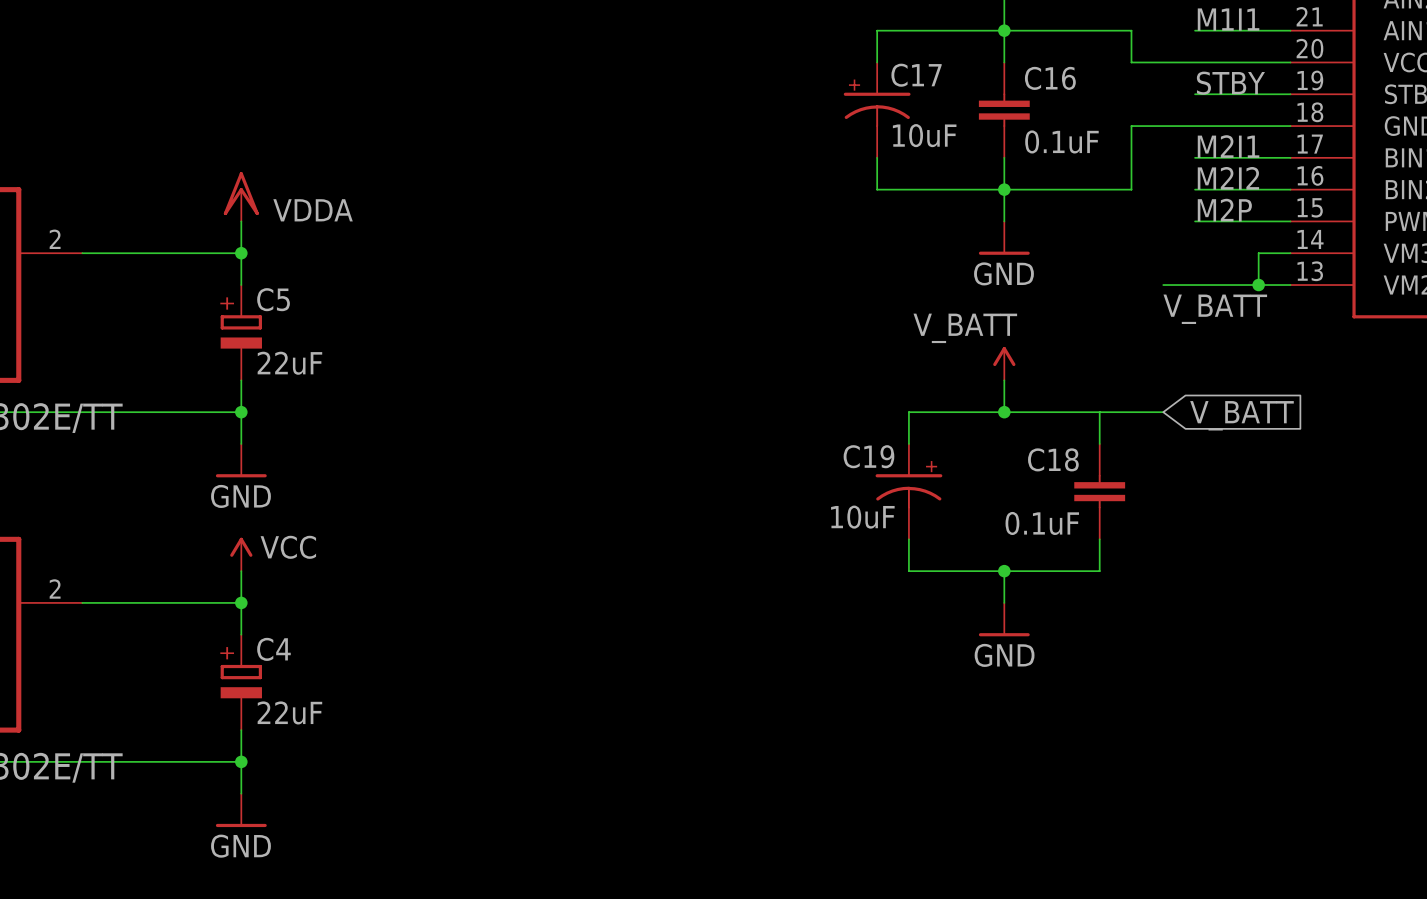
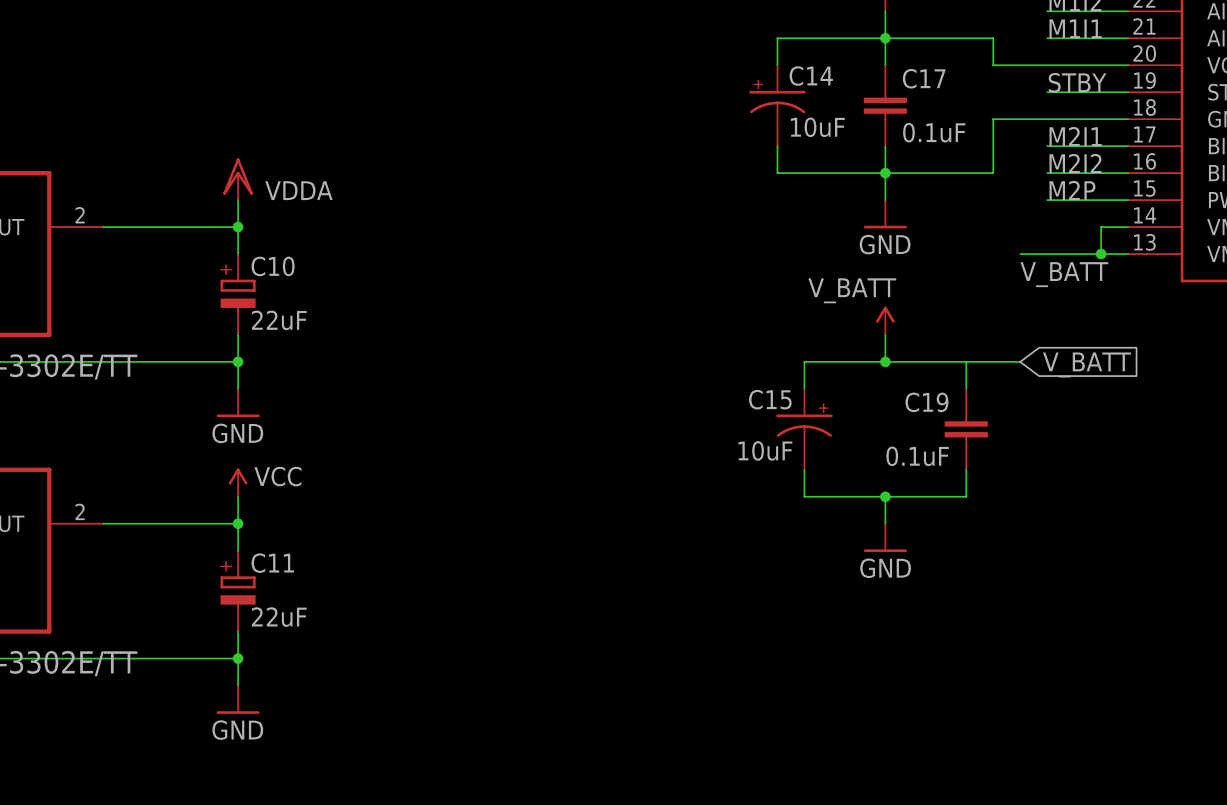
C17 name: C17 (916, 75) -> C14 (811, 76)
C16 name: C16 (1050, 78) -> C17 (924, 78)
C5 name: C5 (273, 299) -> C10 (273, 266)
C19 name: C19 (868, 456) -> C15 (770, 399)
C18 name: C18 (1053, 459) -> C19 (926, 402)
C4 name: C4 (273, 649) -> C11 (272, 563)

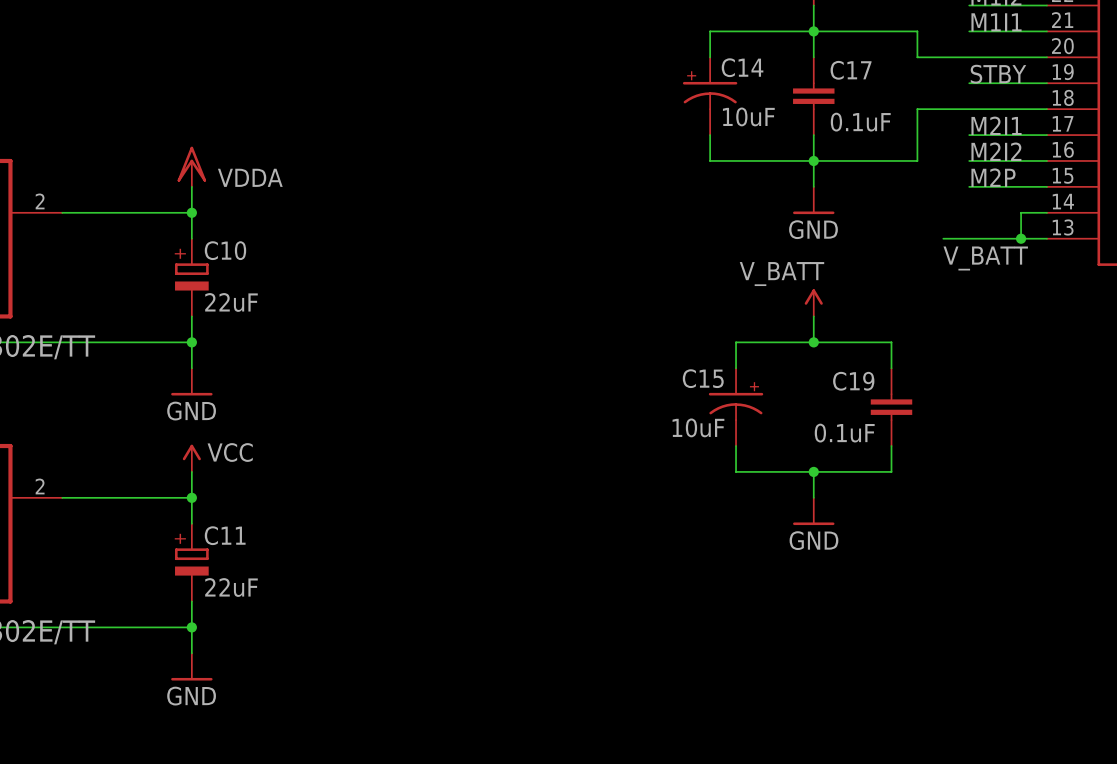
wire: (966, 361) (1020, 361) -> none
global label: V_BATT (1087, 364) -> none

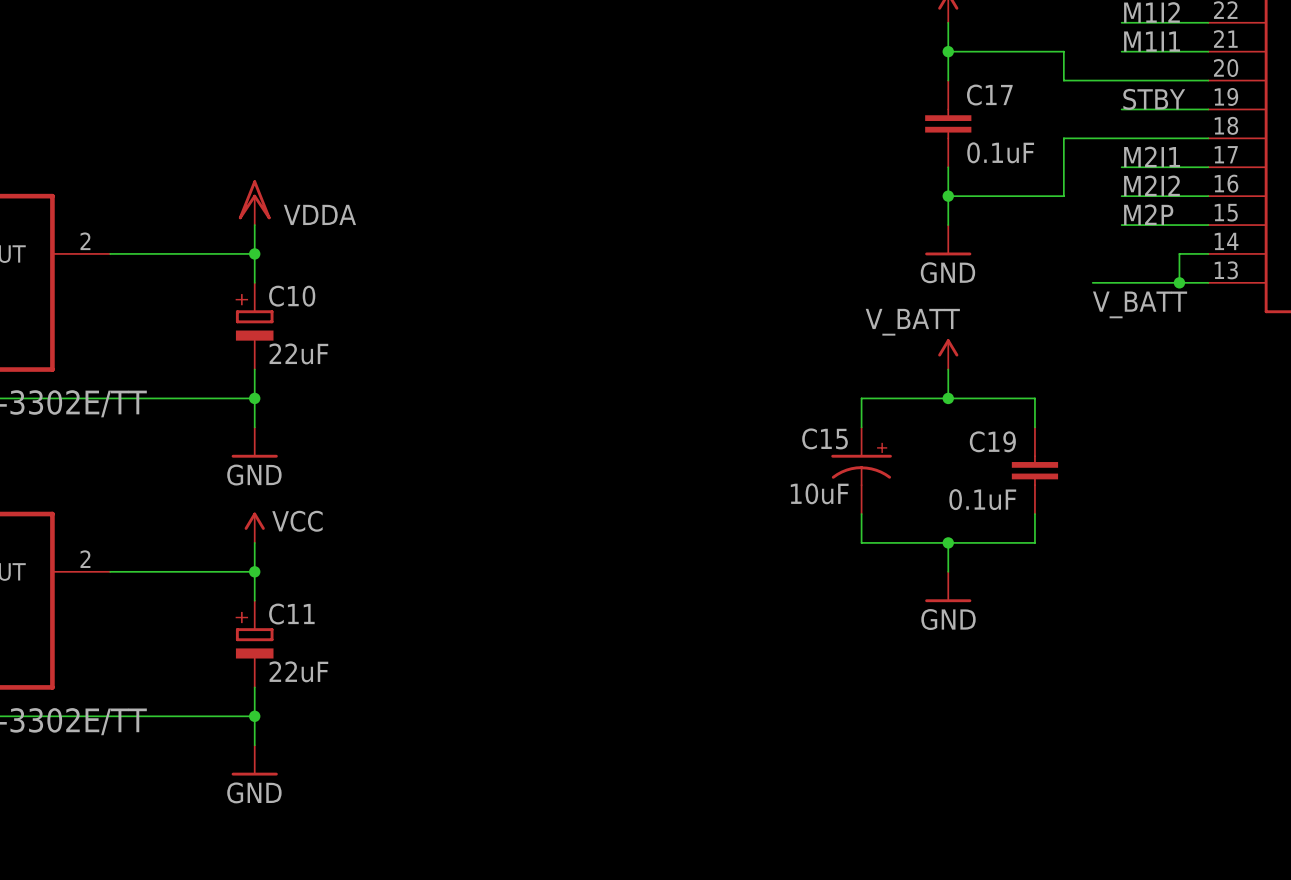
wire: (813, 31) (710, 31) (710, 57) -> none
C14: 10uF (710, 96) -> none
wire: (710, 135) (710, 160) (813, 160) -> none

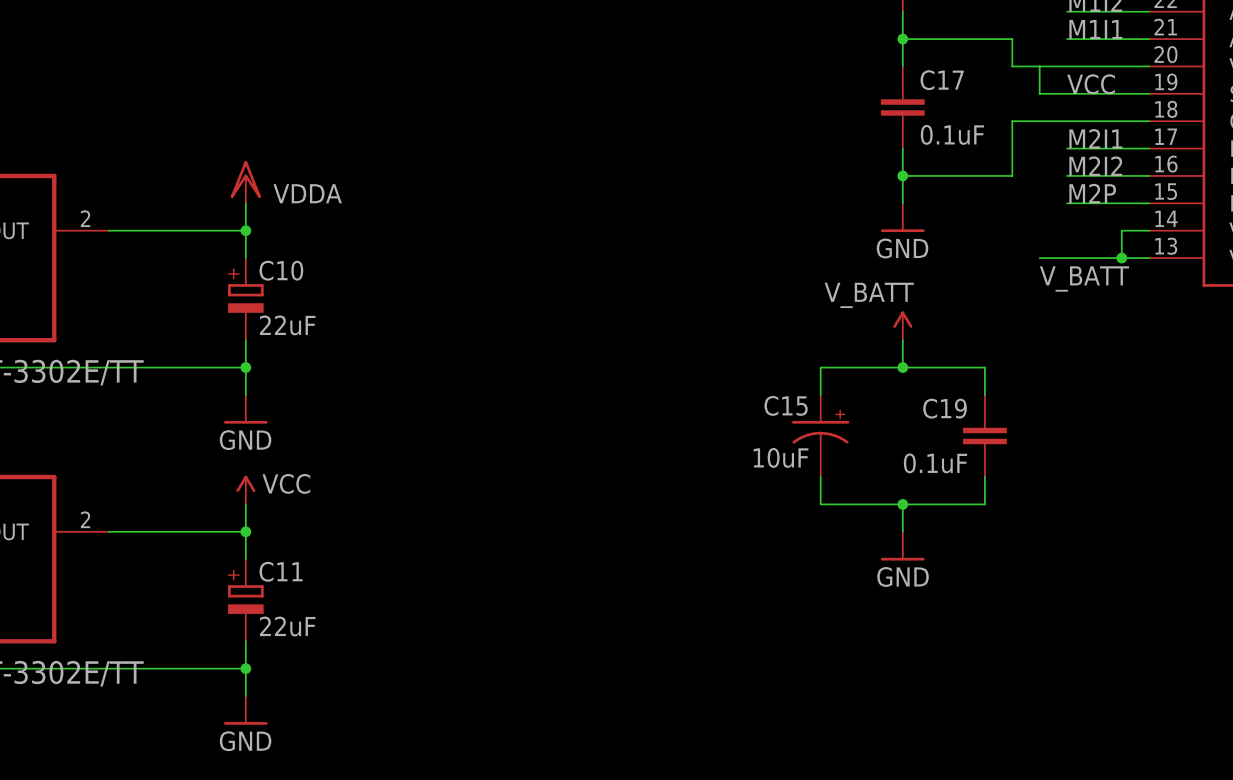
wire: none -> (1039, 66) (1039, 93) (1067, 93)
label: STBY (1154, 99) -> VCC (1091, 84)

